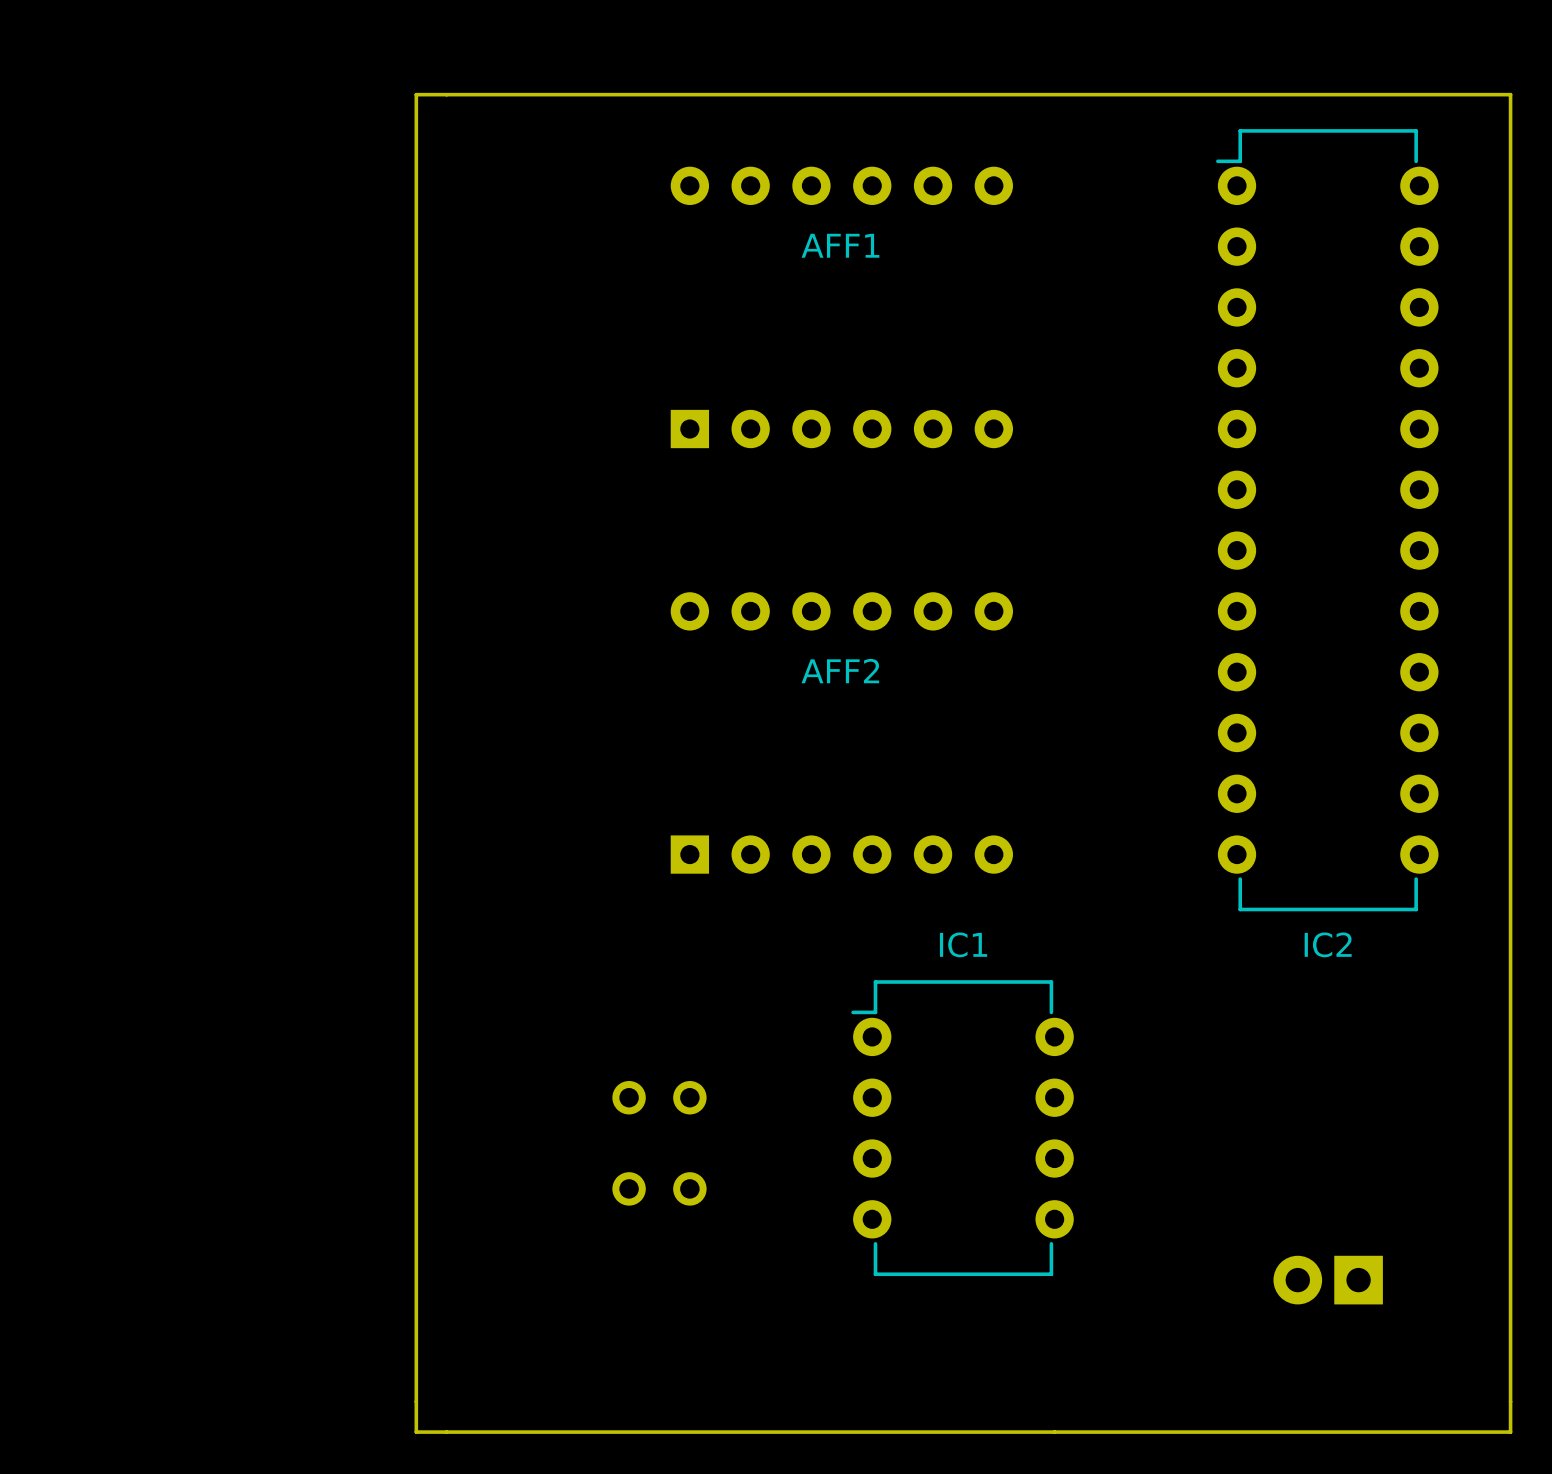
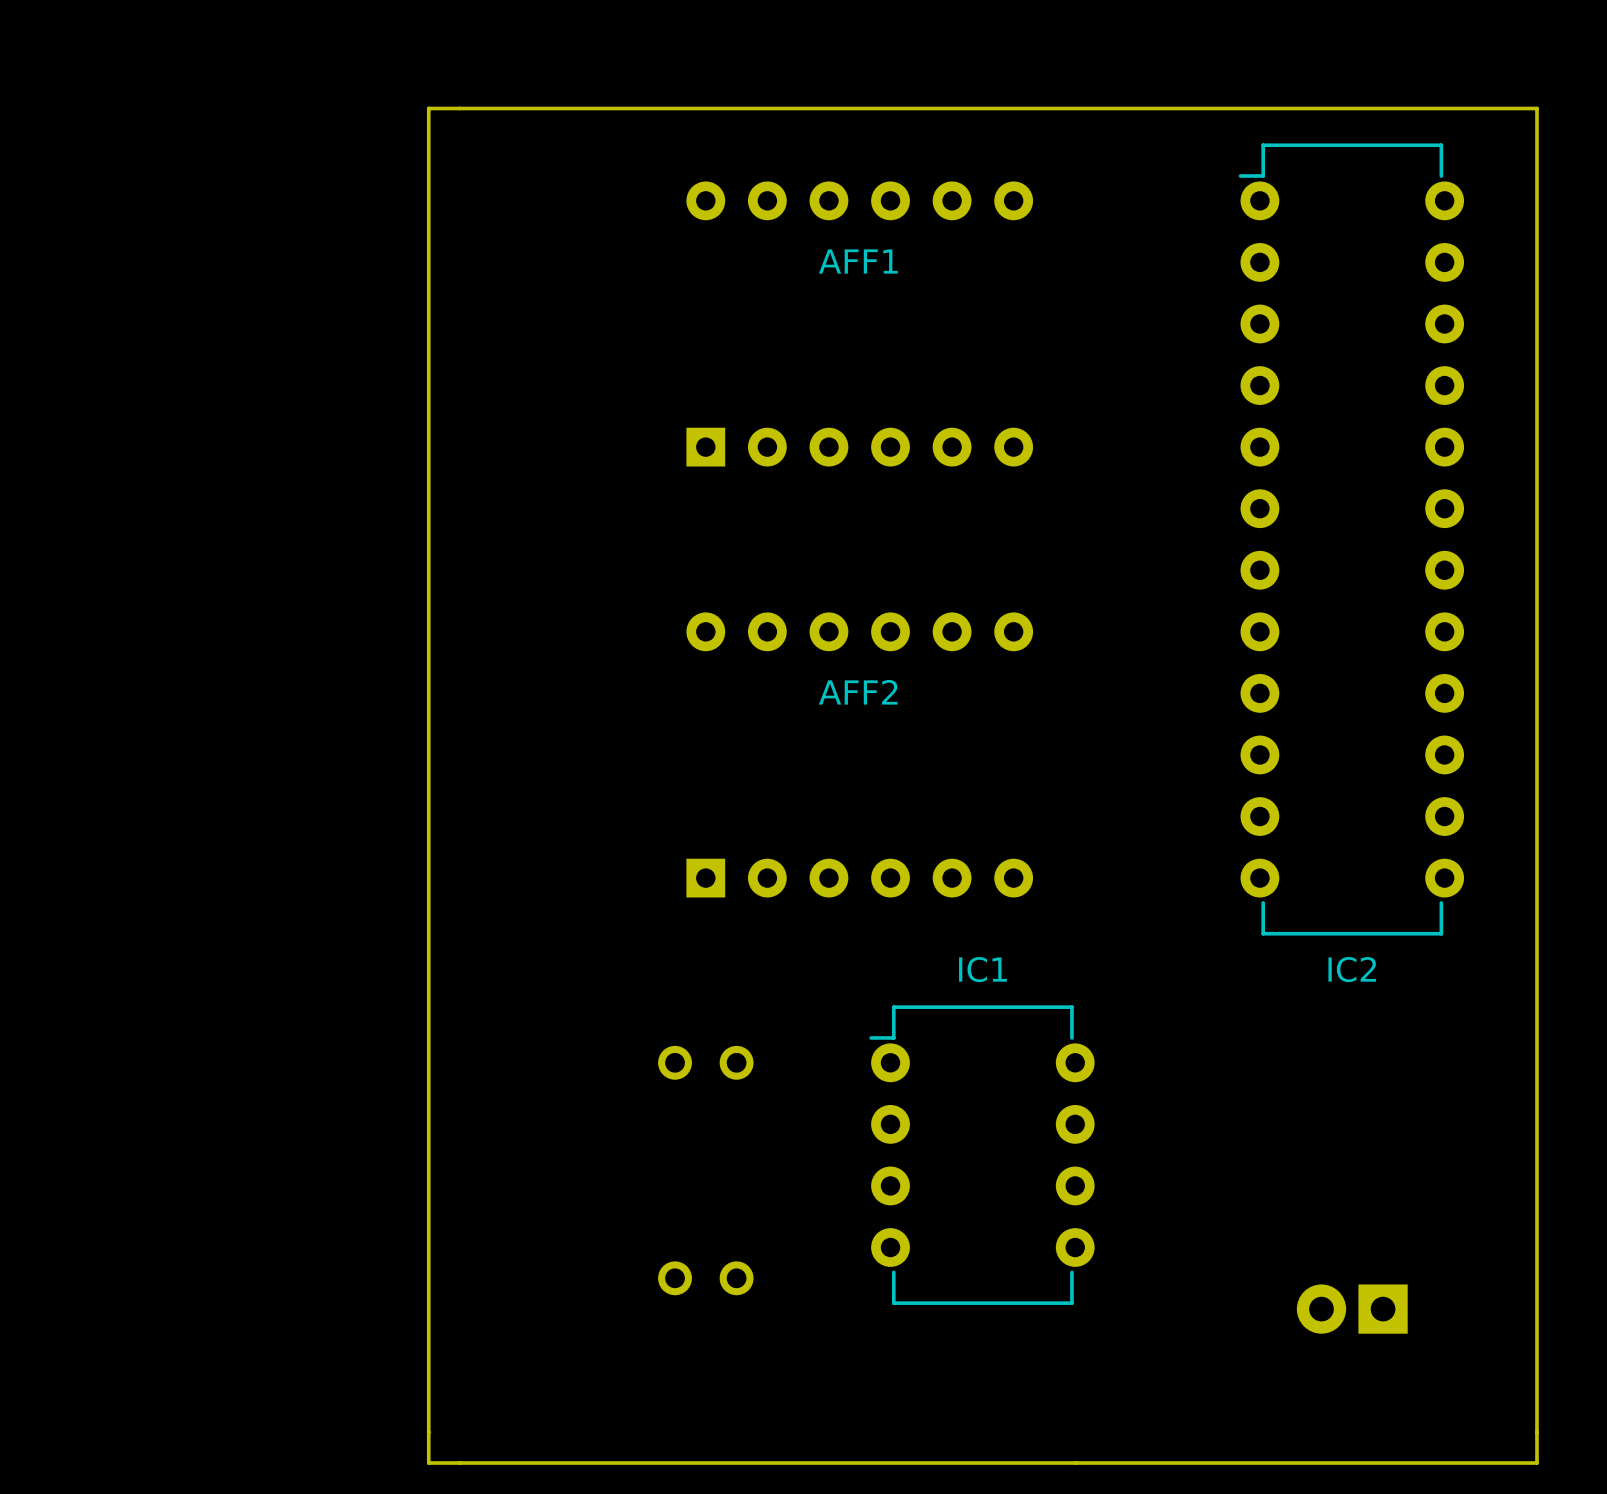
part position: (659, 1097) -> (705, 1062)
part position: (659, 1188) -> (705, 1278)

